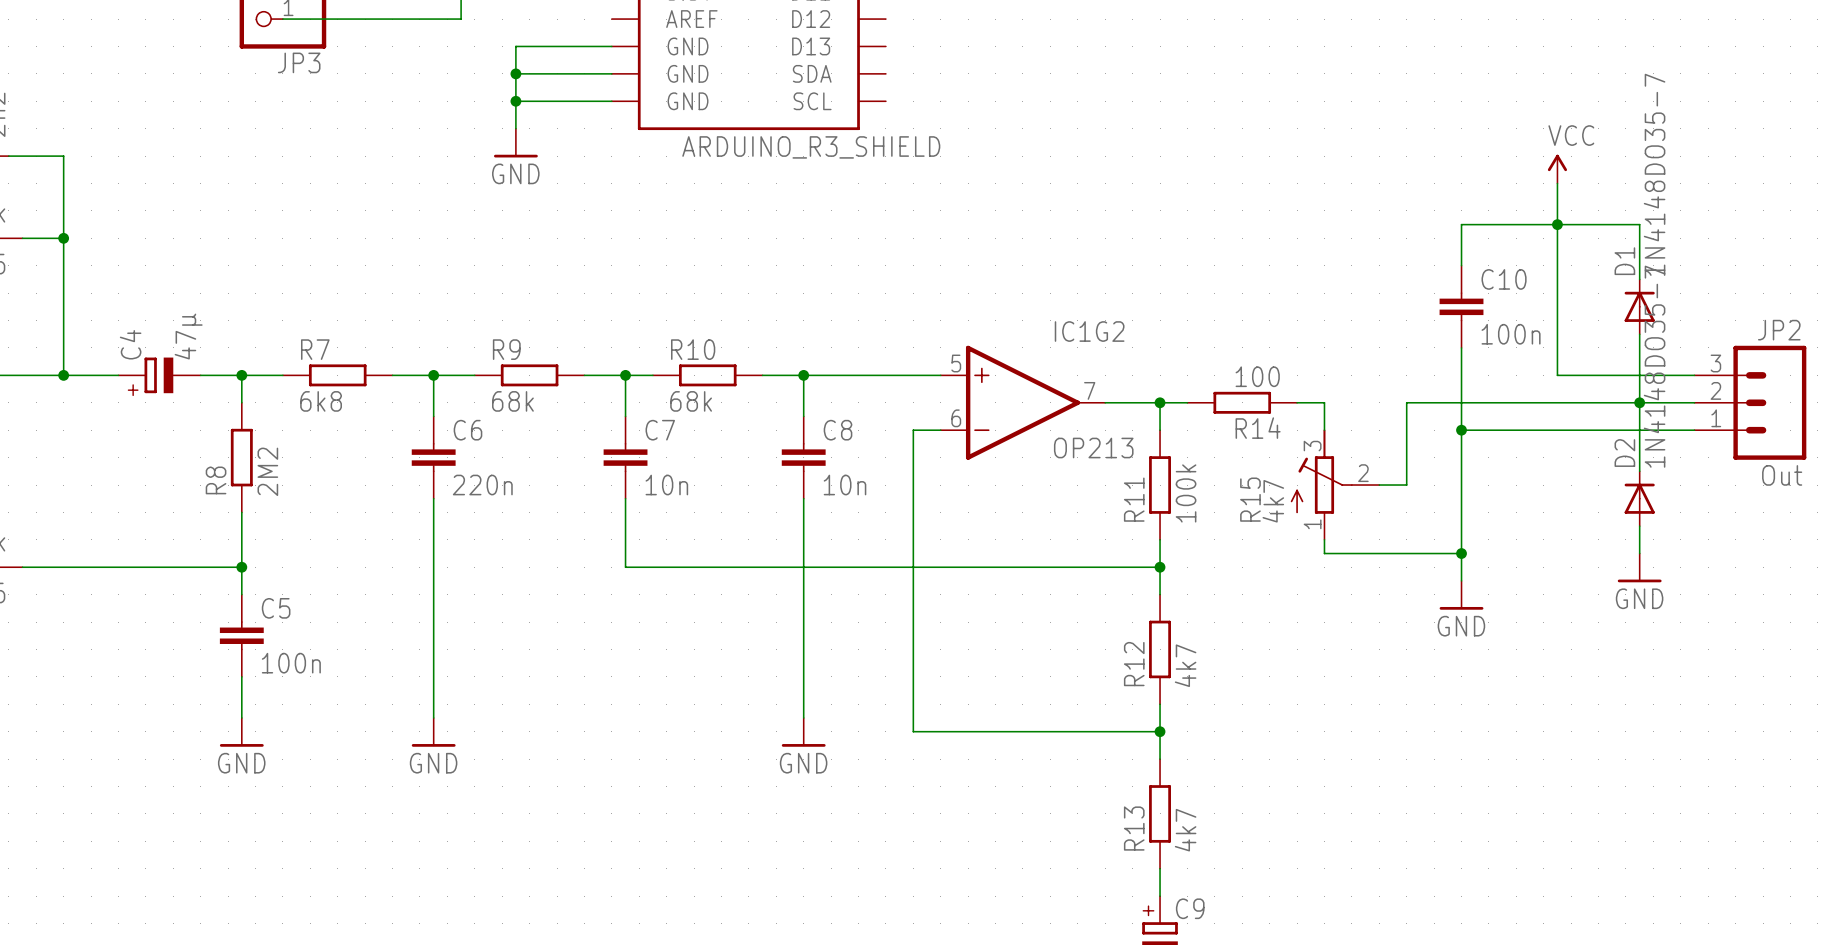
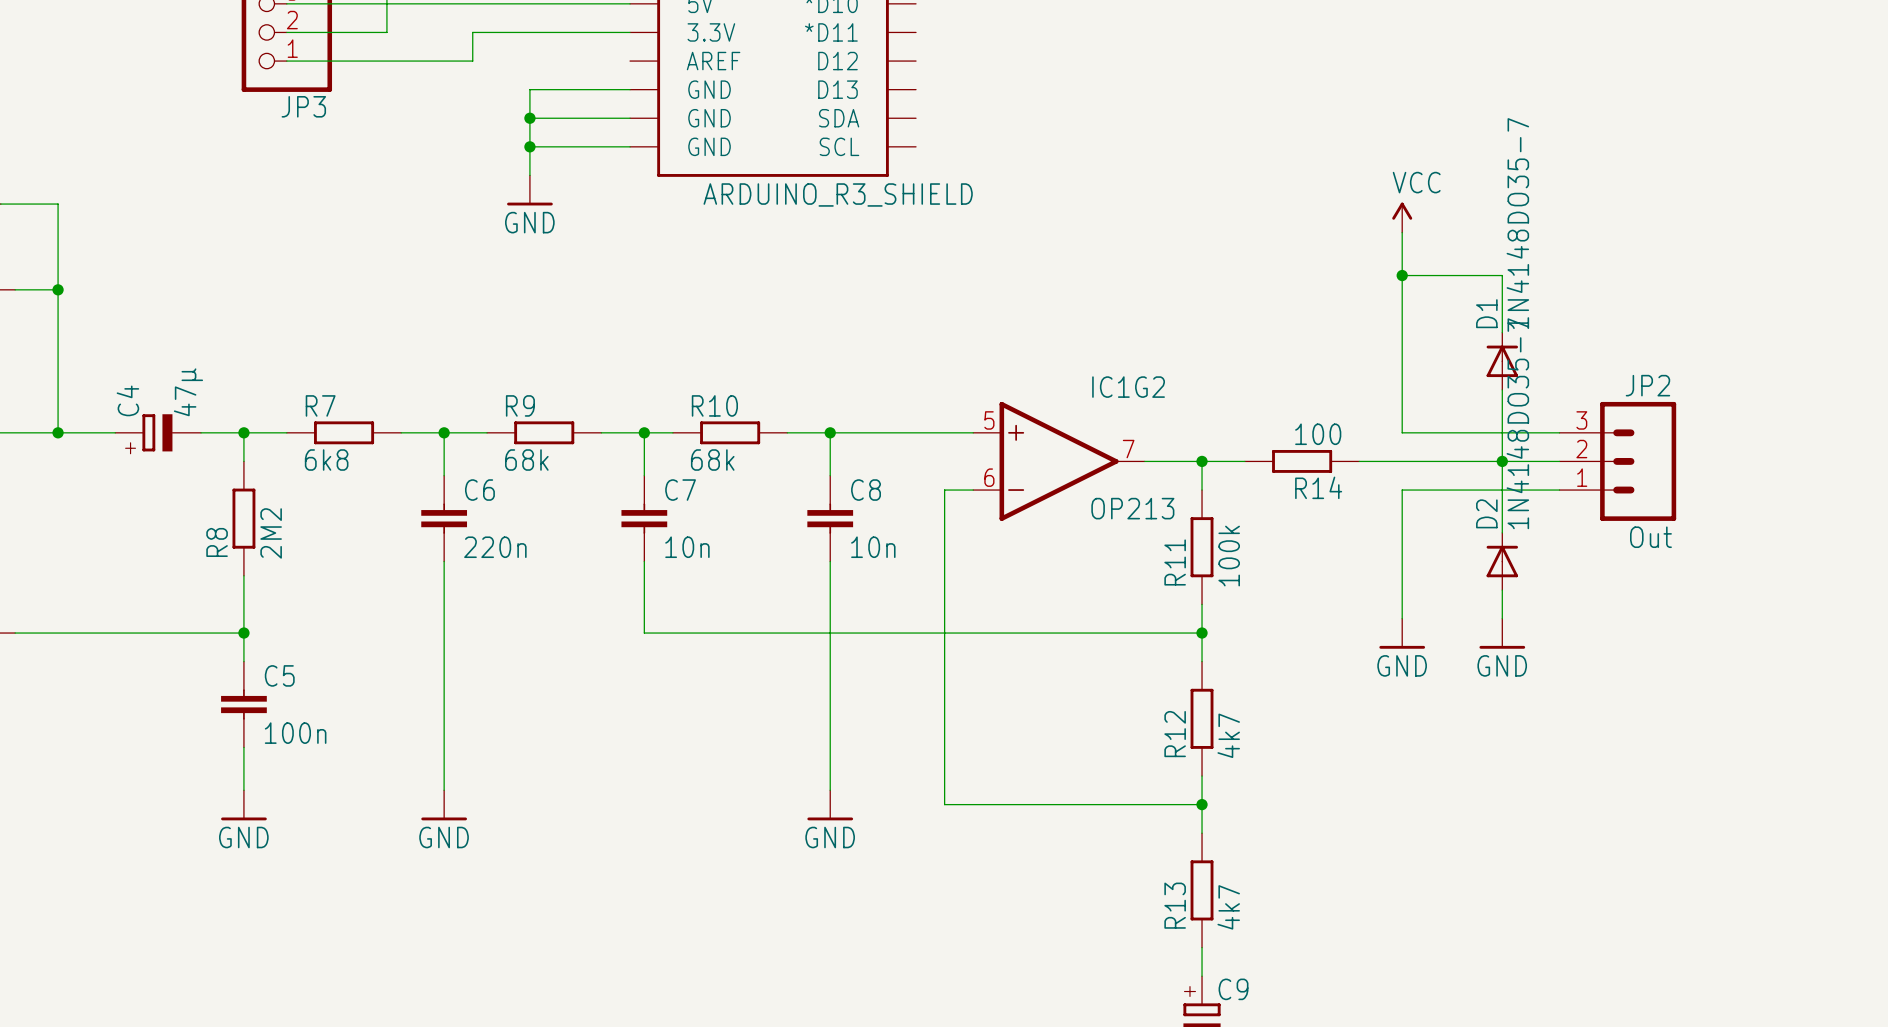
power symbol position: VCC (1557, 169) -> VCC (1402, 217)
wire: none -> (1402, 232) (1402, 432) (1559, 432)
wire: (1557, 183) (1557, 375) (1694, 375) -> none
wire: none -> (1402, 275) (1502, 275) (1502, 332)
junction: none -> (1402, 275)
junction: (1557, 224) -> none
wire: (1461, 265) (1461, 224) (1639, 224) (1639, 279) -> none
C10: 100n (1461, 306) -> none
D1 position: (1639, 306) -> (1502, 361)
wire: (1639, 334) (1639, 471) -> (1502, 389) (1502, 532)
wire: (1461, 347) (1461, 580) -> none
R14 position: (1242, 402) -> (1302, 461)
wire: (1324, 402) (1324, 430) -> (1373, 461) (1459, 461)
wire: (1406, 402) (1406, 485) (1379, 485) -> none
wire: (1502, 402) (1694, 402) -> none
junction: (1639, 402) -> none
JP2 position: (1750, 402) -> (1617, 461)
wire: none -> (1516, 490) (1402, 490) (1402, 618)
junction position: (1461, 430) -> (1502, 461)
wire: (1502, 430) (1694, 430) -> none
R15: 4k7 (1335, 484) -> none
D2 position: (1639, 498) -> (1502, 561)
wire: (1639, 526) (1639, 553) -> (1502, 590) (1502, 618)
wire: (1324, 539) (1324, 553) (1461, 553) -> none
junction: (1461, 553) -> none
power symbol: none -> GND (1402, 633)
power symbol: GND (1639, 567) -> none
power symbol position: GND (1461, 595) -> GND (1502, 633)

